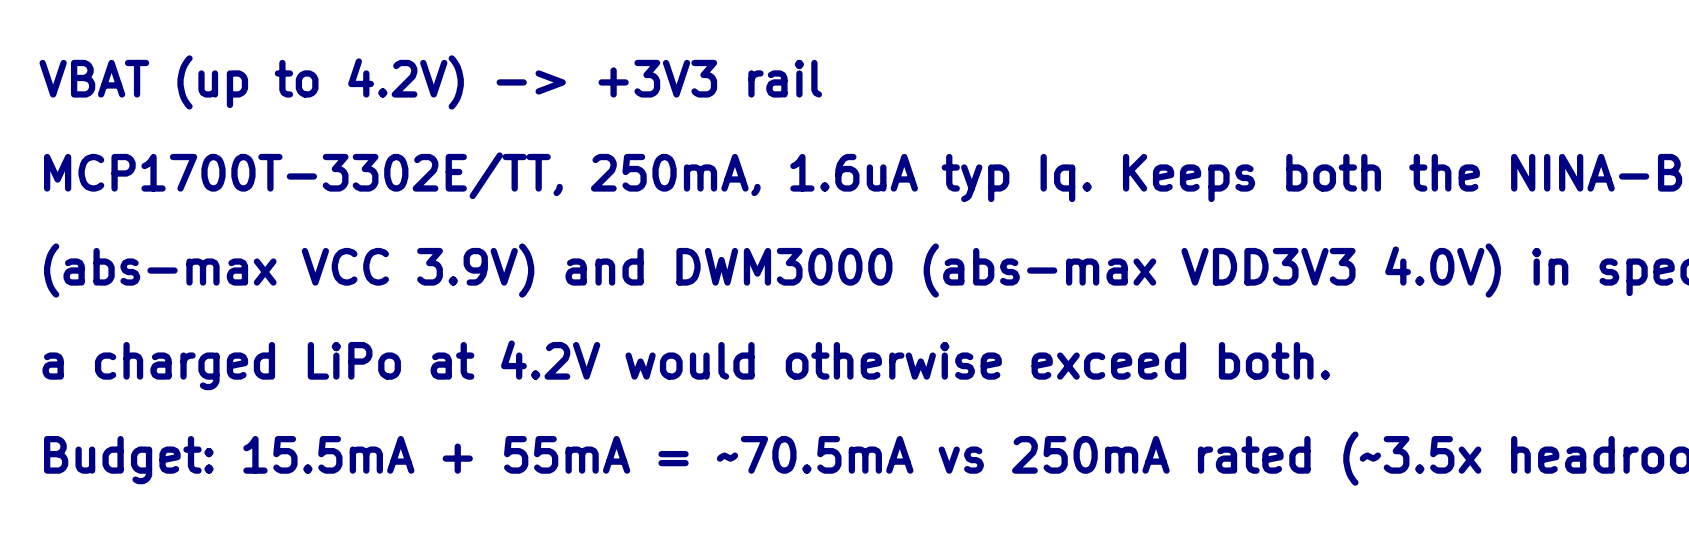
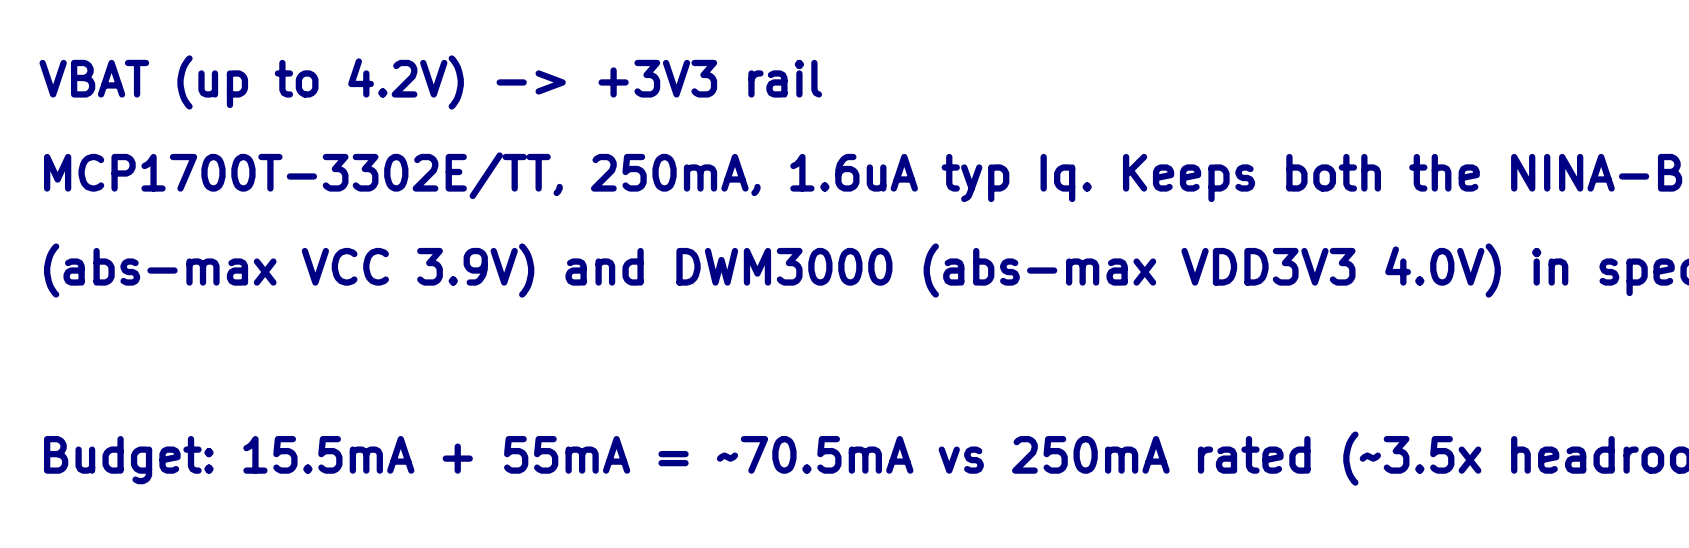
text: a charged LiPo at 4.2V would otherwise exceed both. (686, 365) -> none

